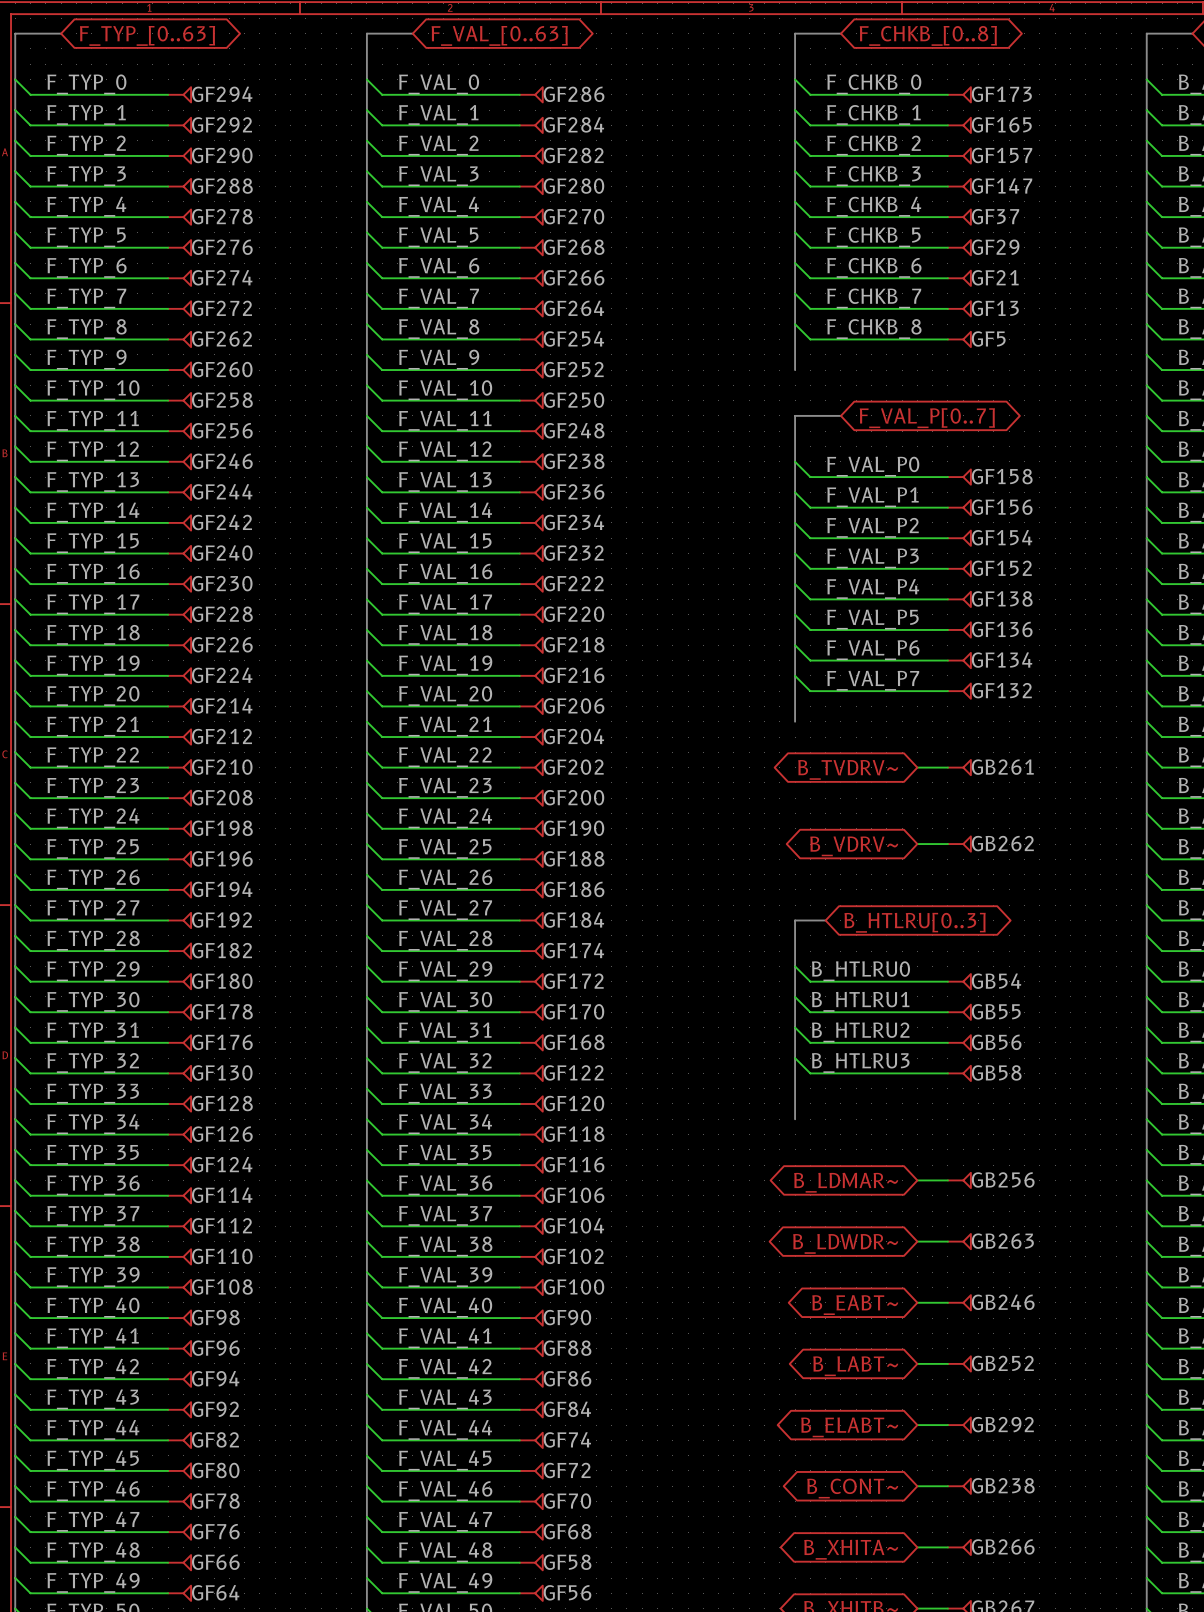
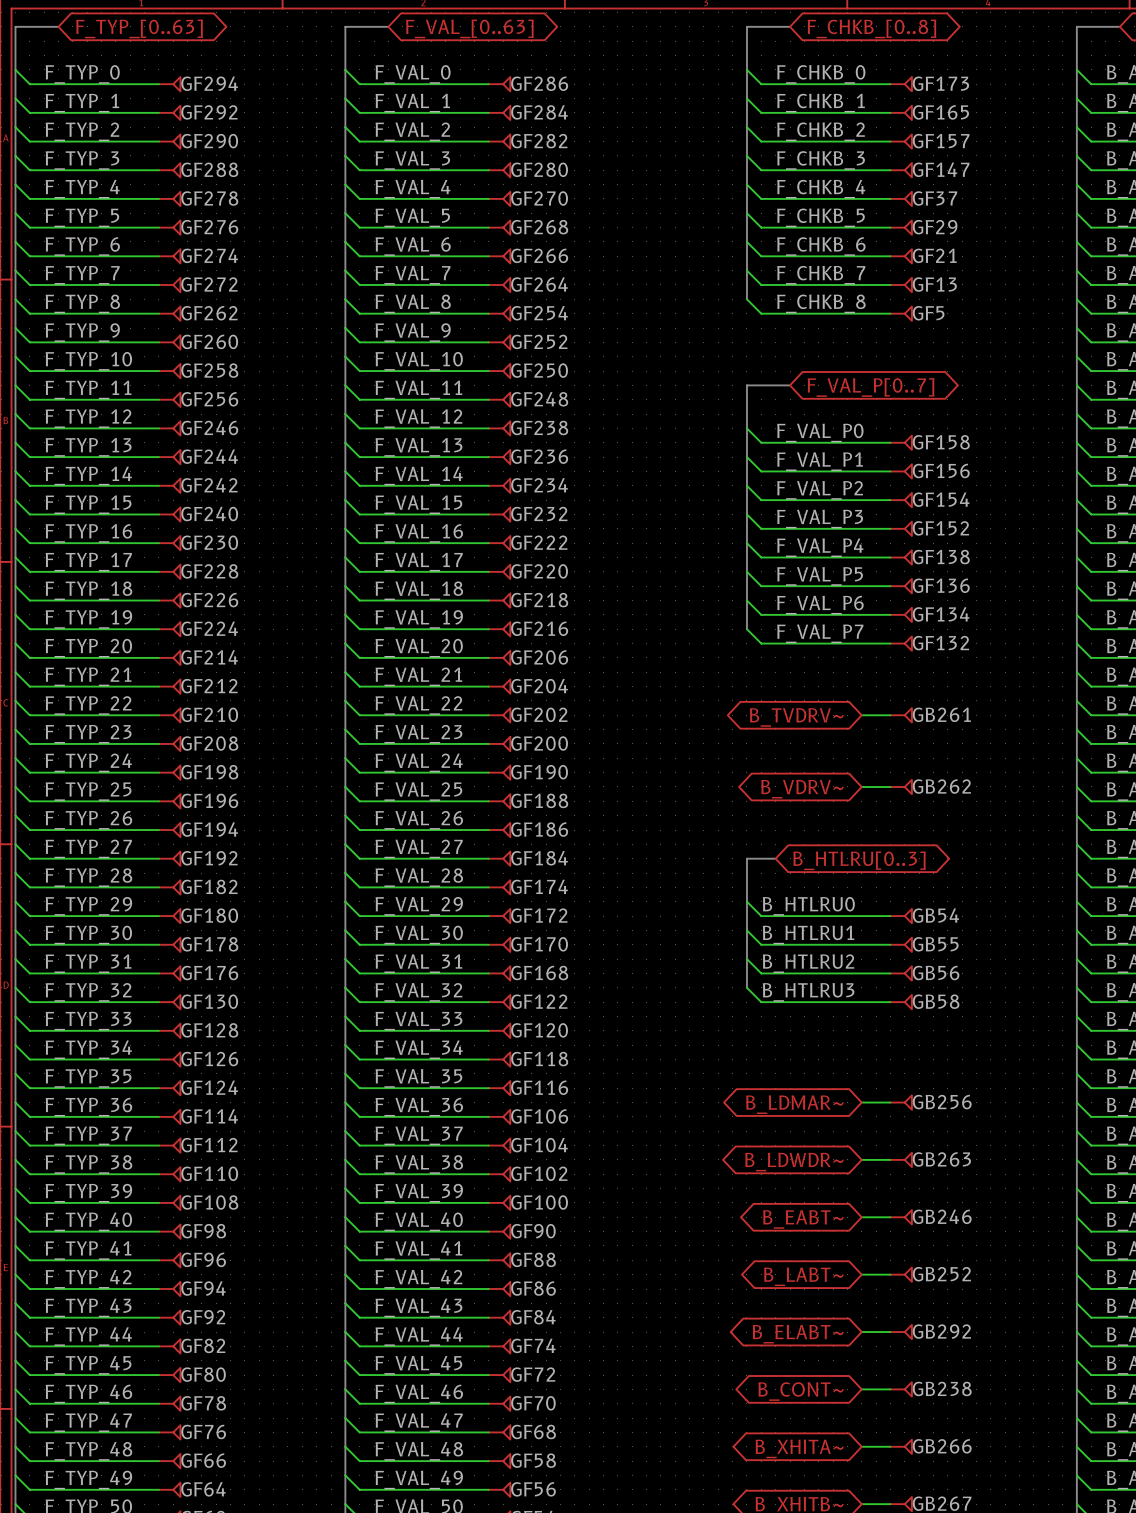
bus: (795, 324) (795, 370) -> none
bus: (795, 675) (795, 721) -> none
bus: (795, 1058) (795, 1119) -> none

